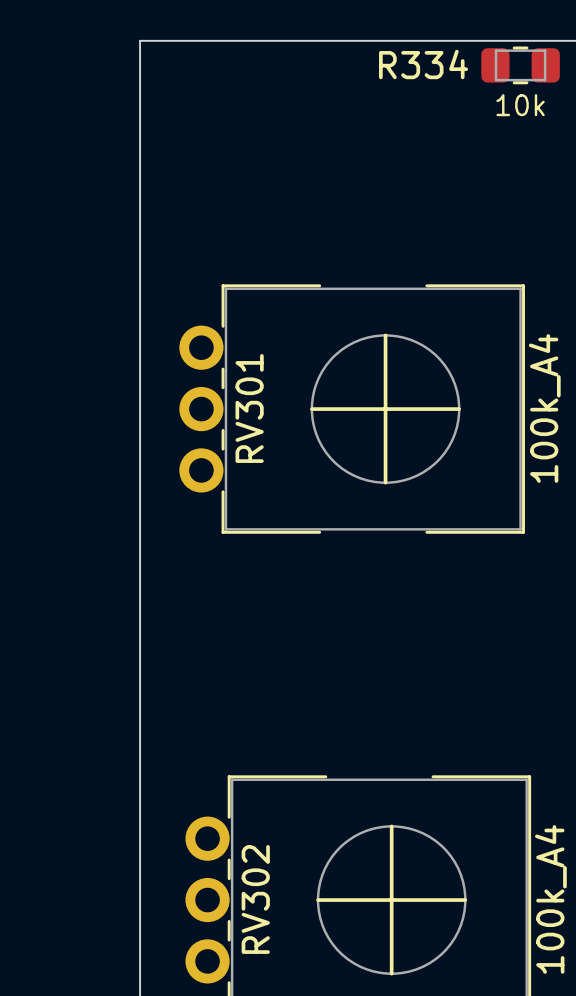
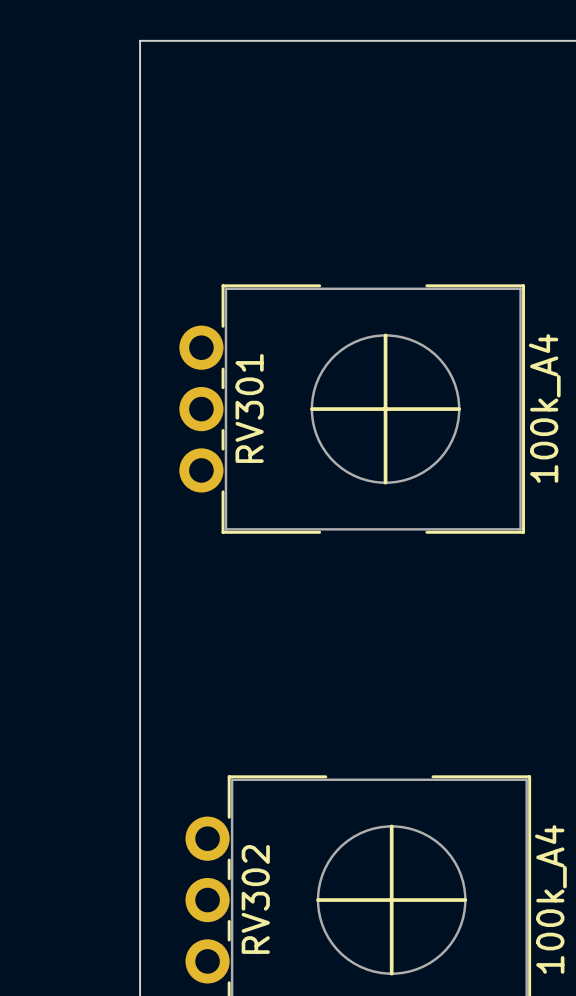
R334: 10k (520, 65) -> none

